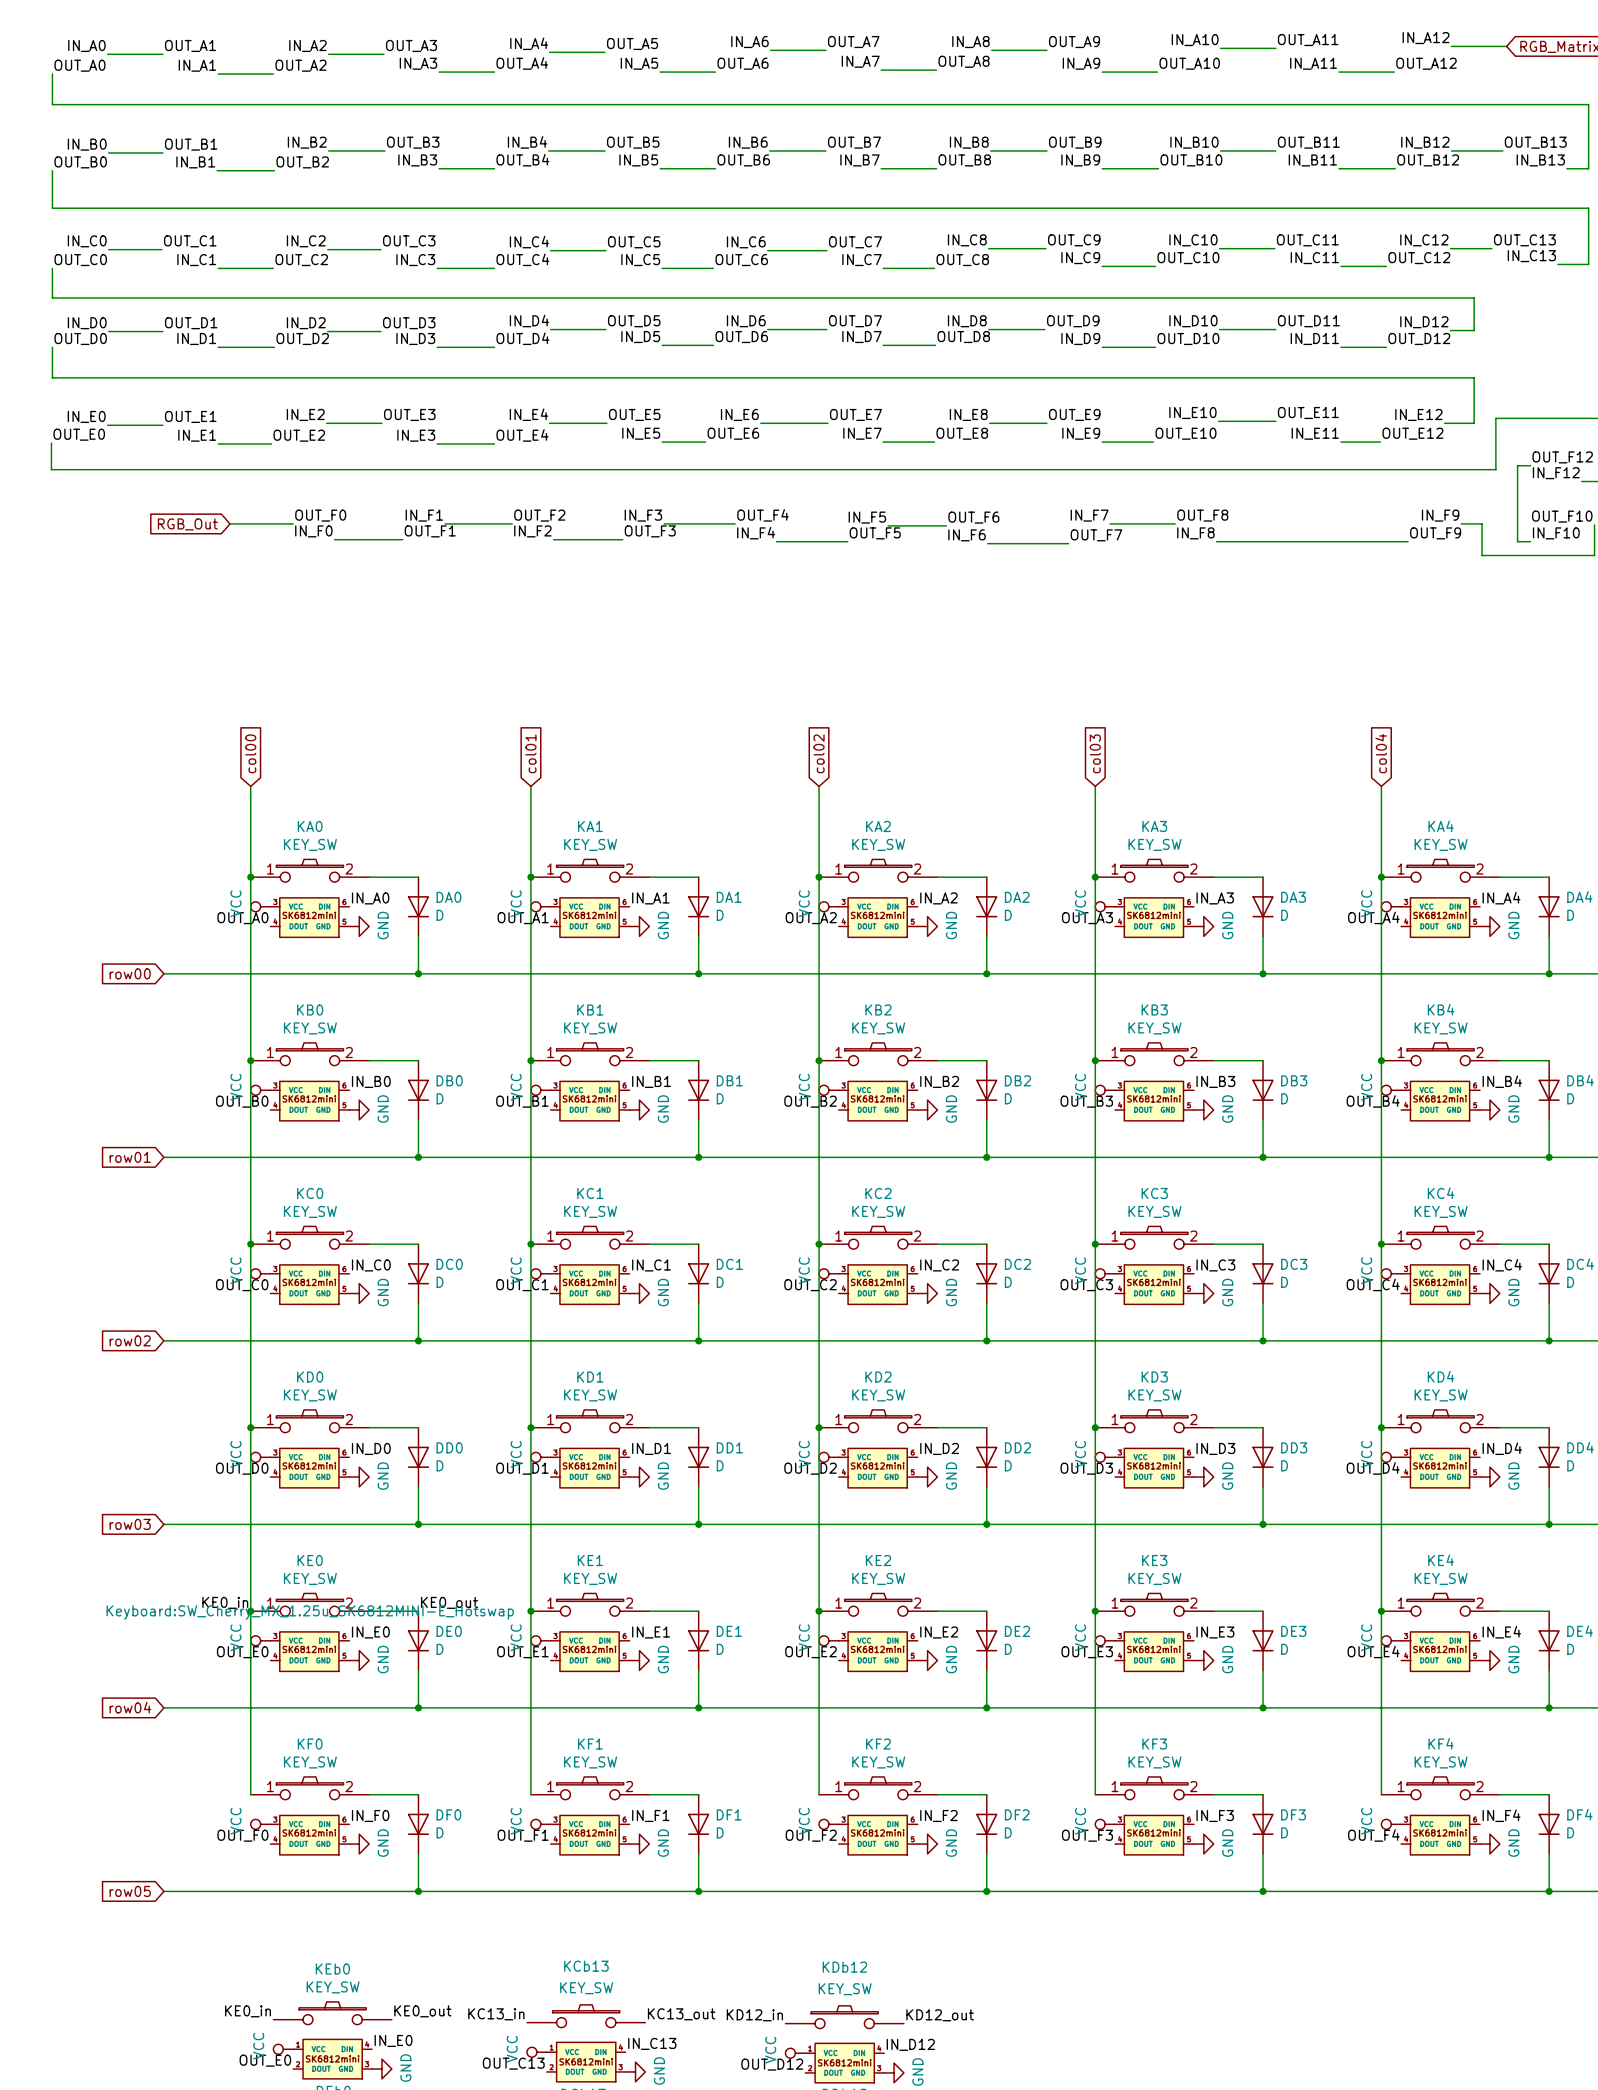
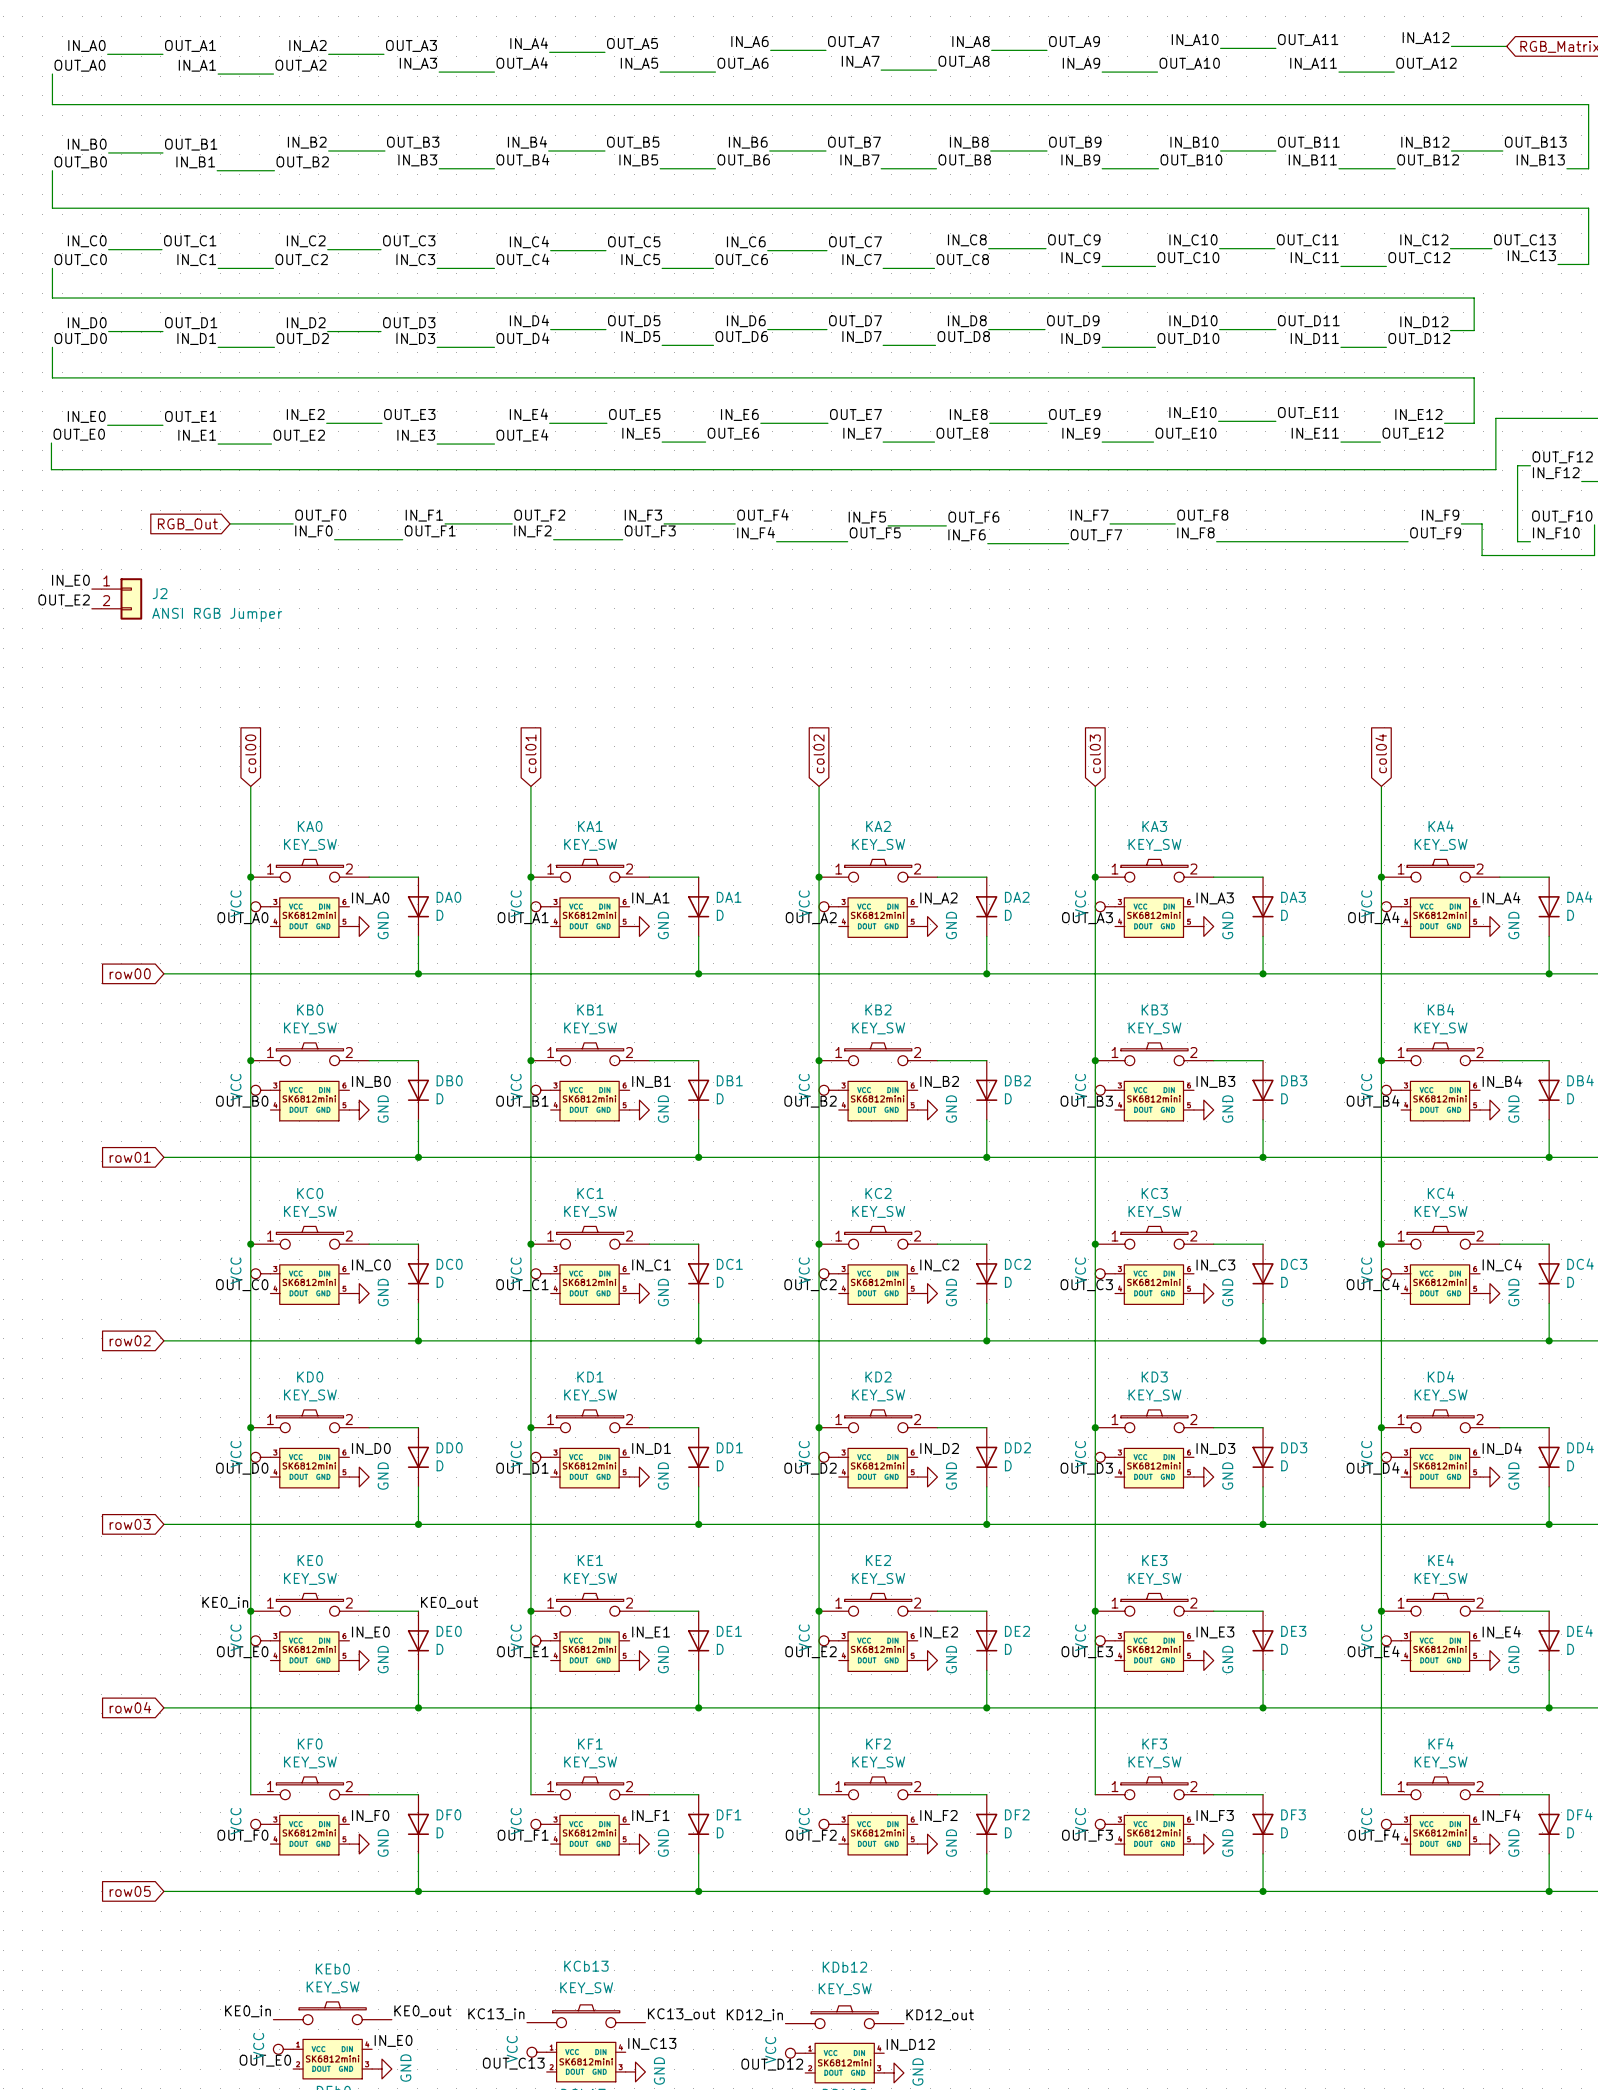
label: none -> IN_E0 (70, 580)
J2: none -> ANSI RGB Jumper (117, 598)
label: none -> OUT_E2 (64, 600)
KE0 text: Keyboard:SW_Cherry_MX_1.25u_SK6812MINI-E_Hotswap (310, 1612) -> none

